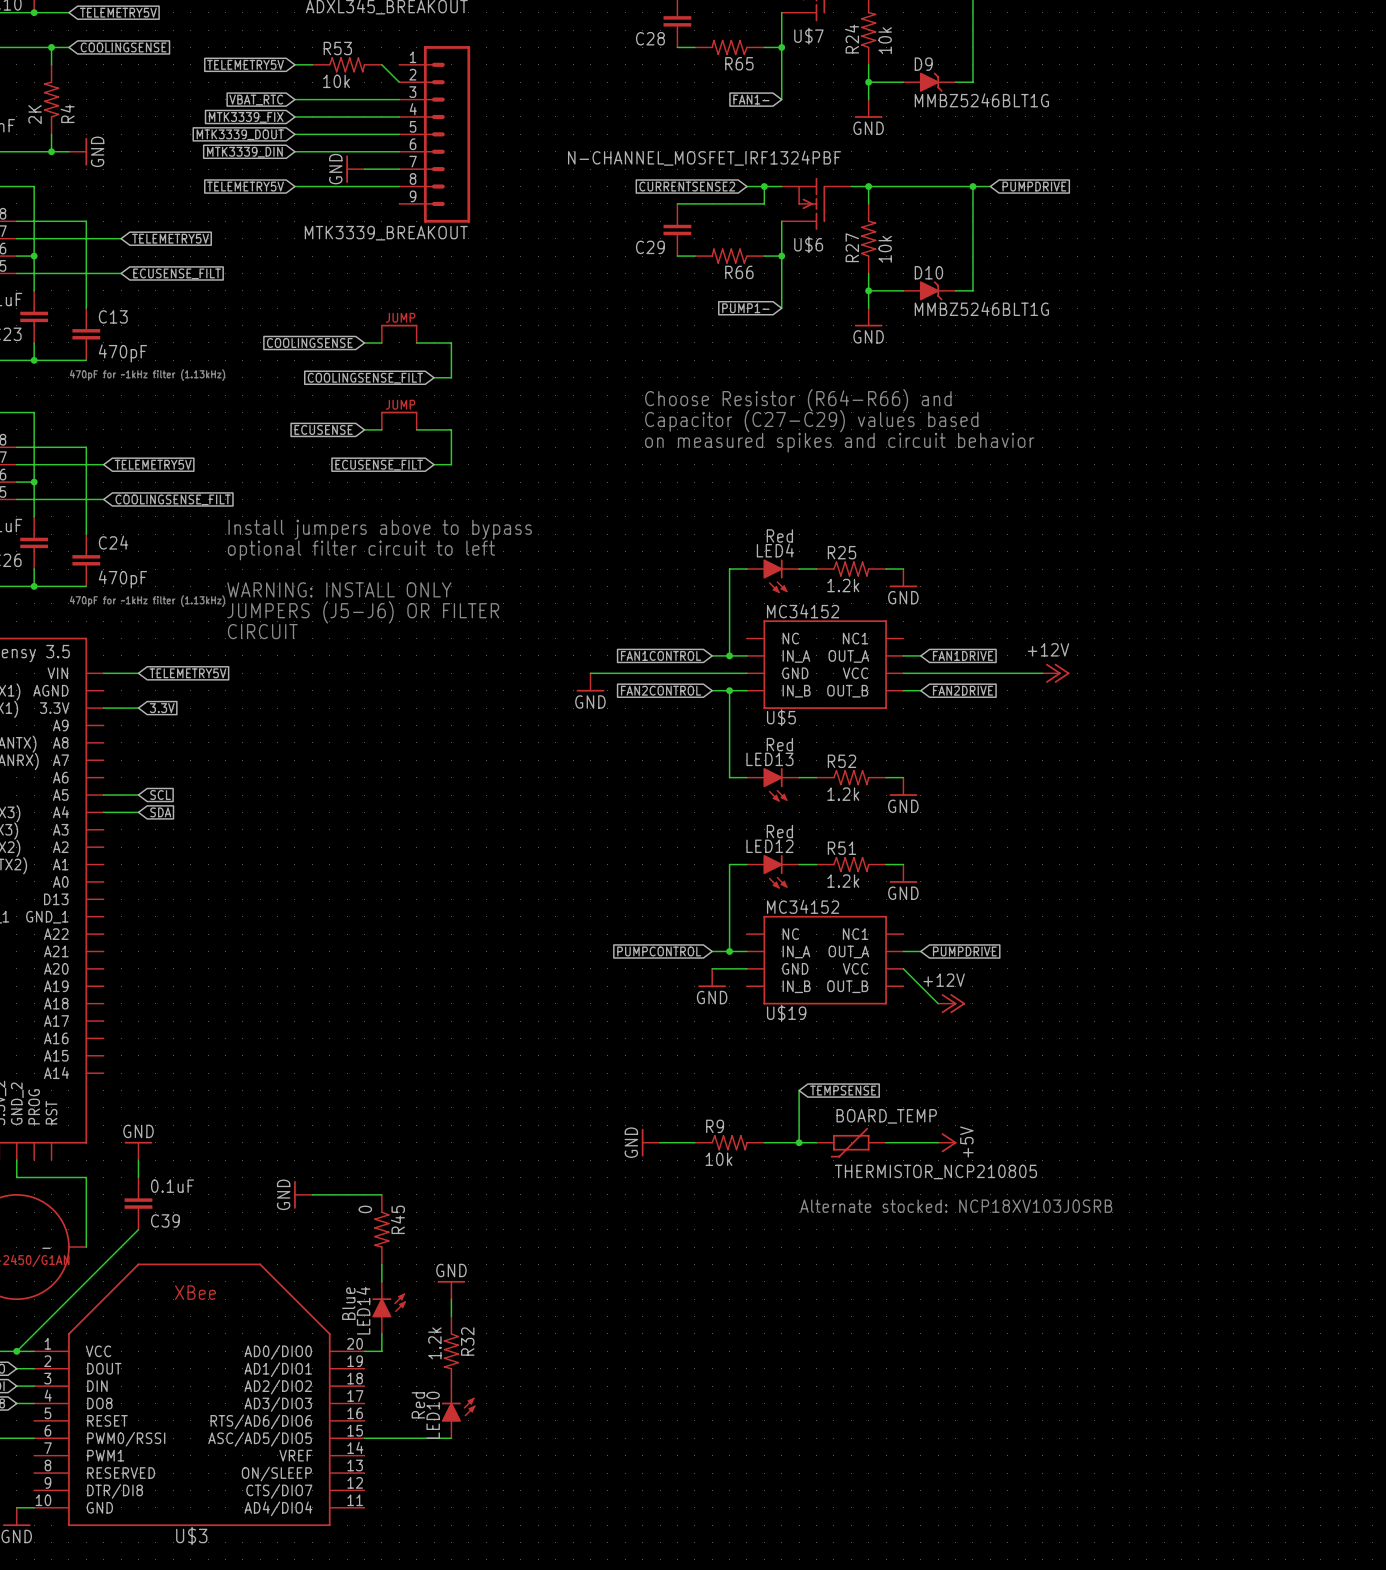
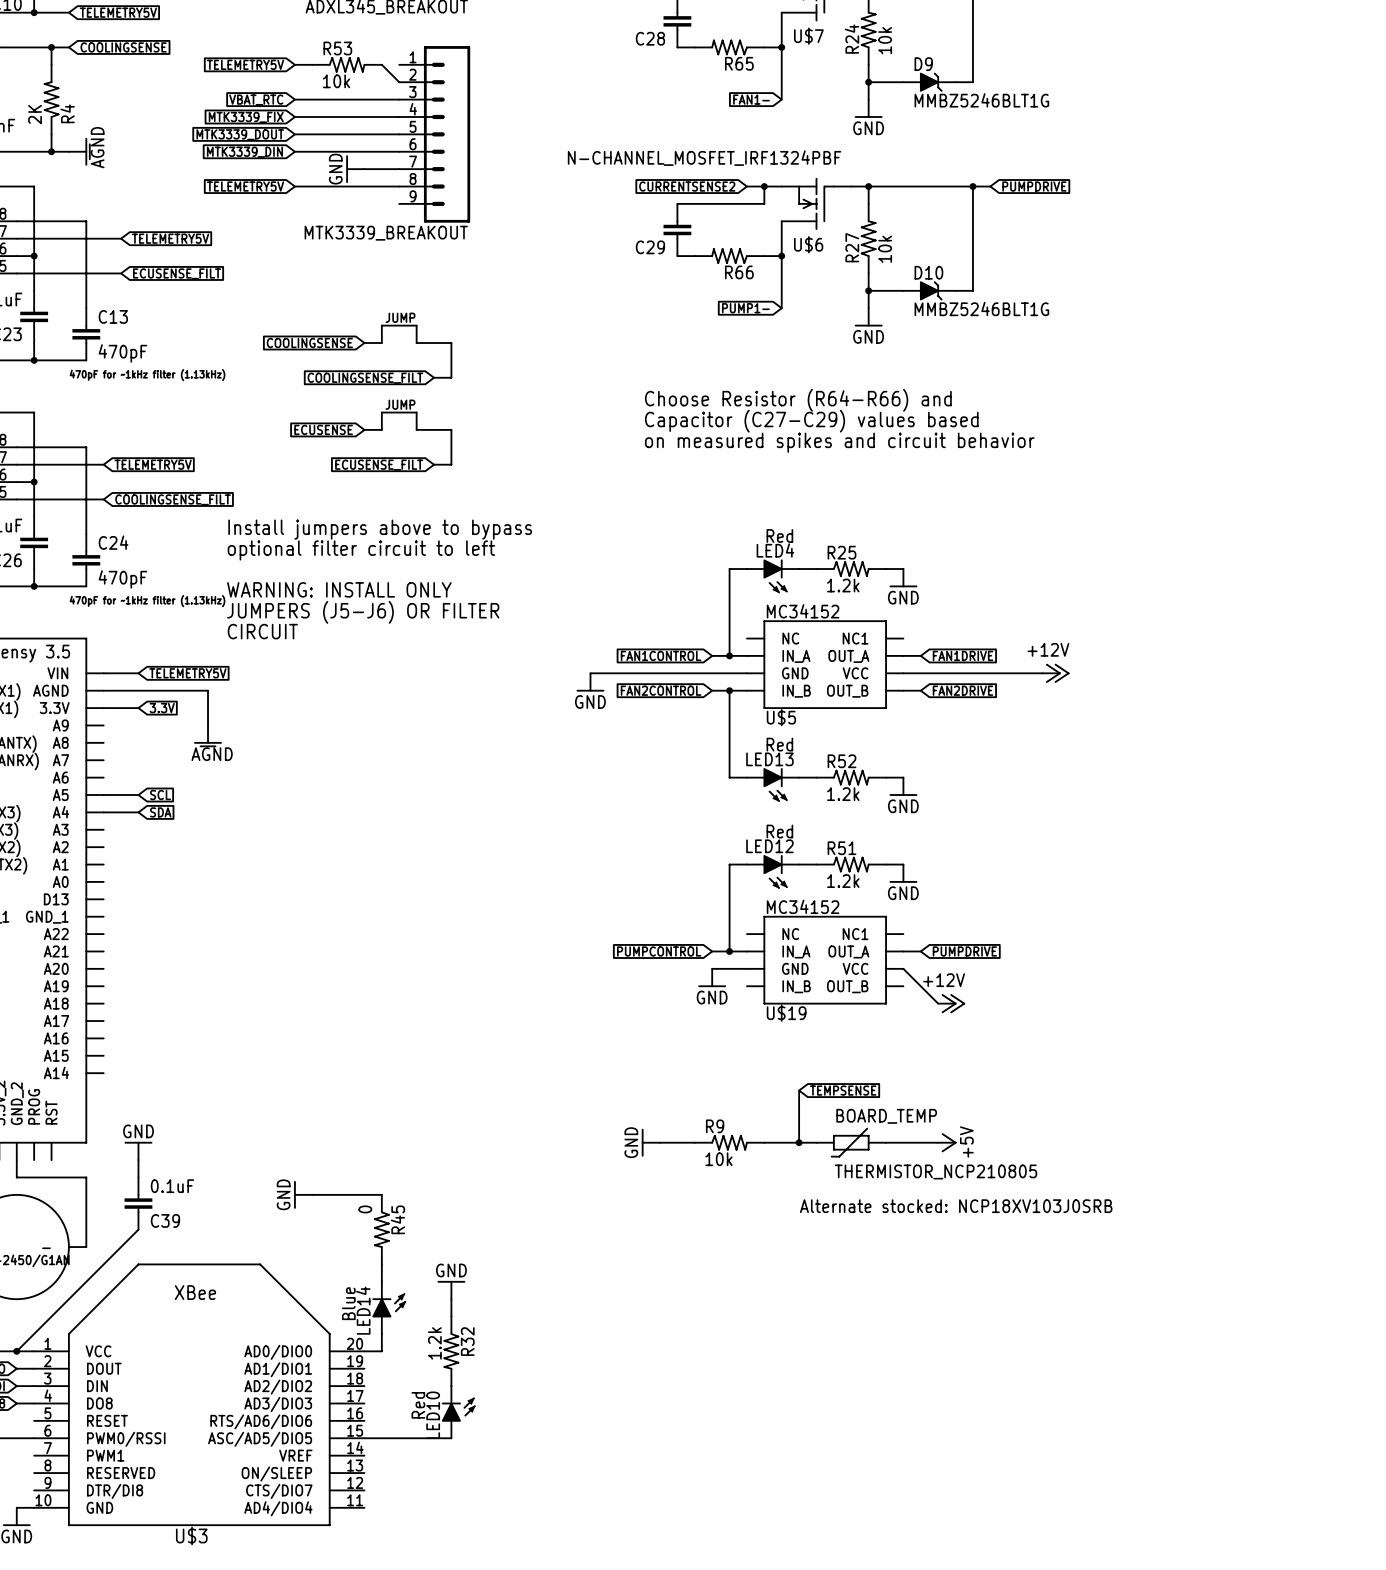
power symbol: GND (78, 151) -> AGND (79, 151)
wire: none -> (103, 690) (208, 690) (208, 725)
power symbol: none -> AGND (208, 736)

